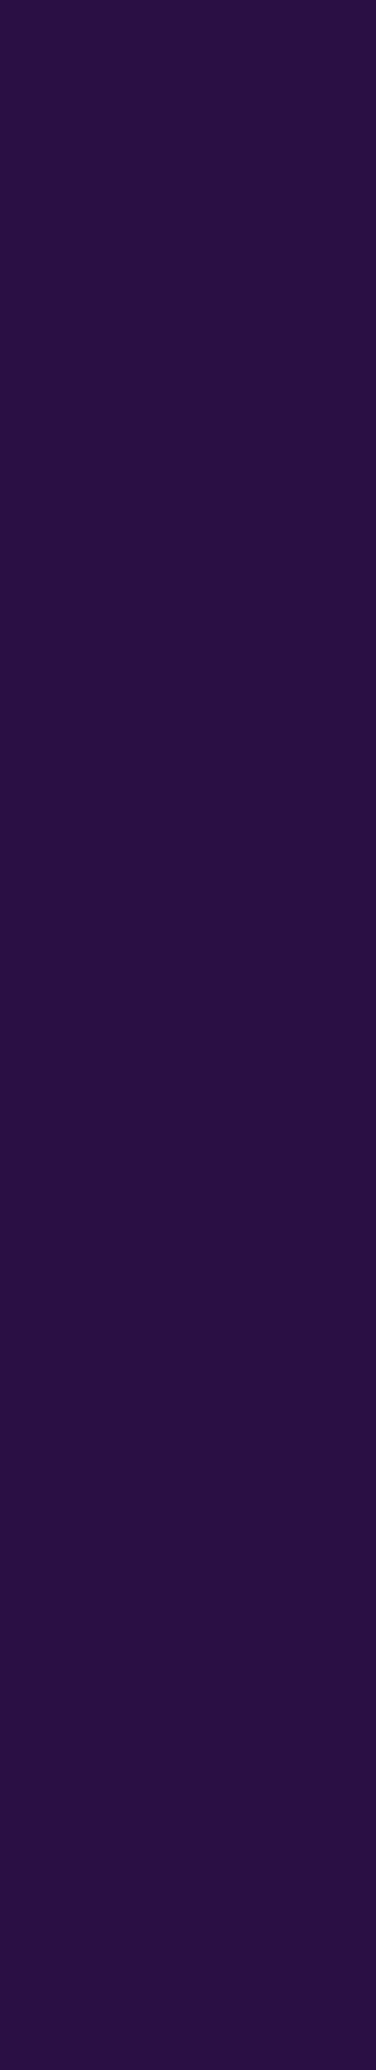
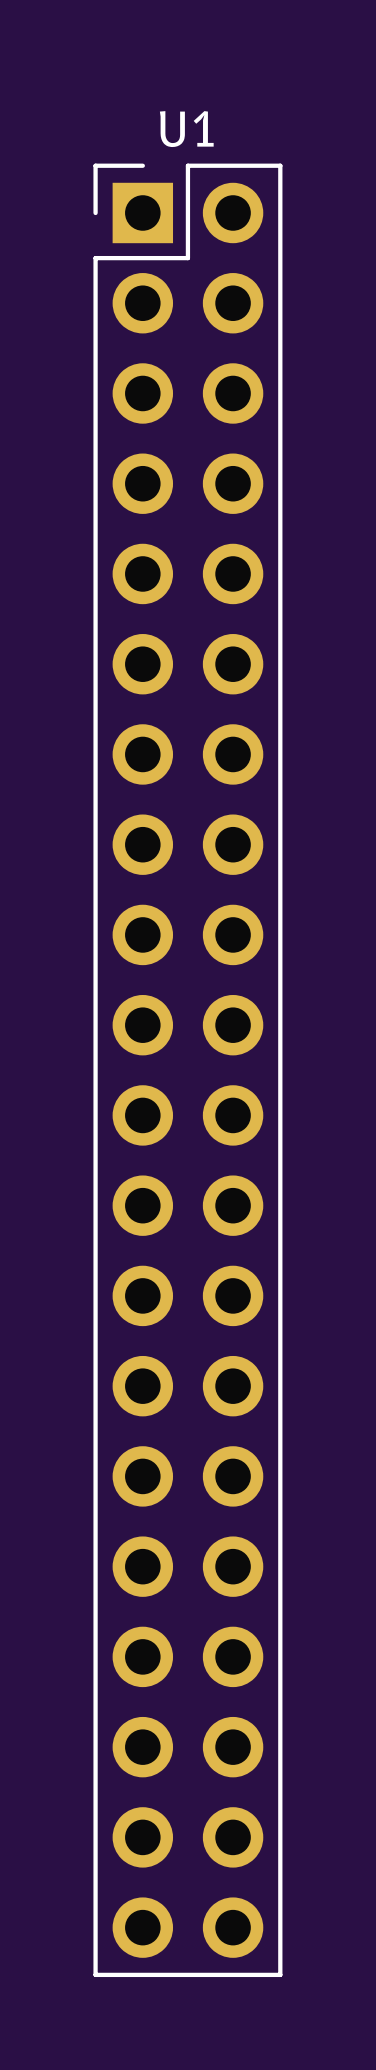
U1: none -> (187, 1070)

